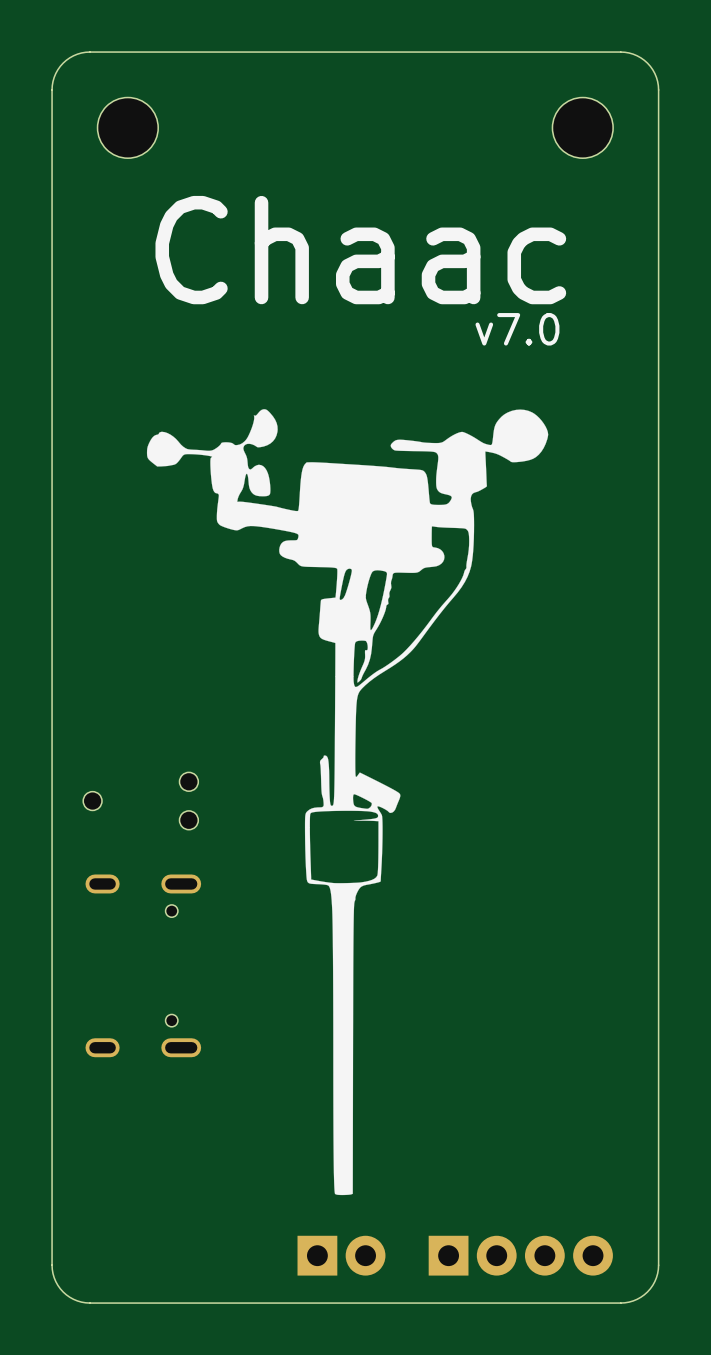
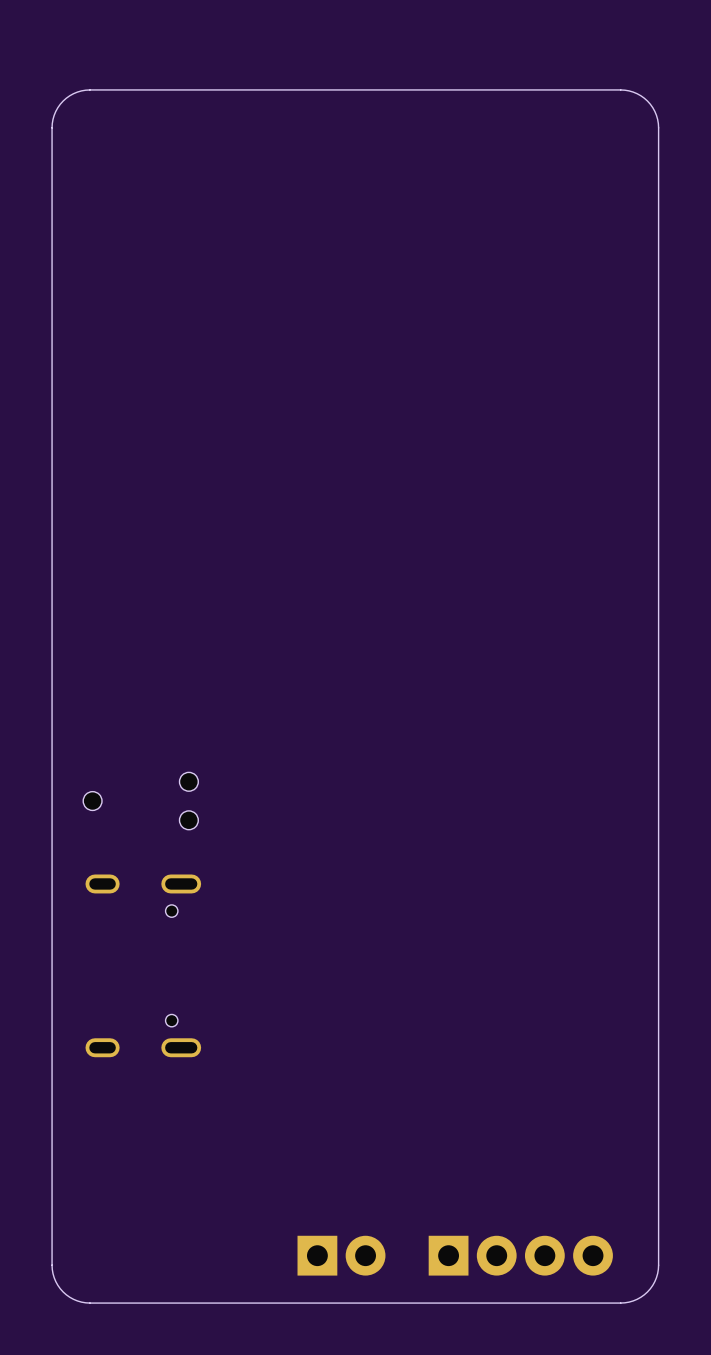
part: (127, 127) -> none
part: (582, 127) -> none
board edge: (658, 127) (658, 85) (654, 73) (640, 57) (620, 52) (85, 52) (66, 60) (55, 73) (52, 85) (52, 127) -> (658, 127) (654, 111) (647, 101) (637, 93) (620, 89) (85, 90) (73, 93) (63, 101) (55, 111) (52, 127)
text: Chaac (360, 250) -> none
text: v7.0 (517, 329) -> none
drawing: [146, 409, 549, 1196] -> none

